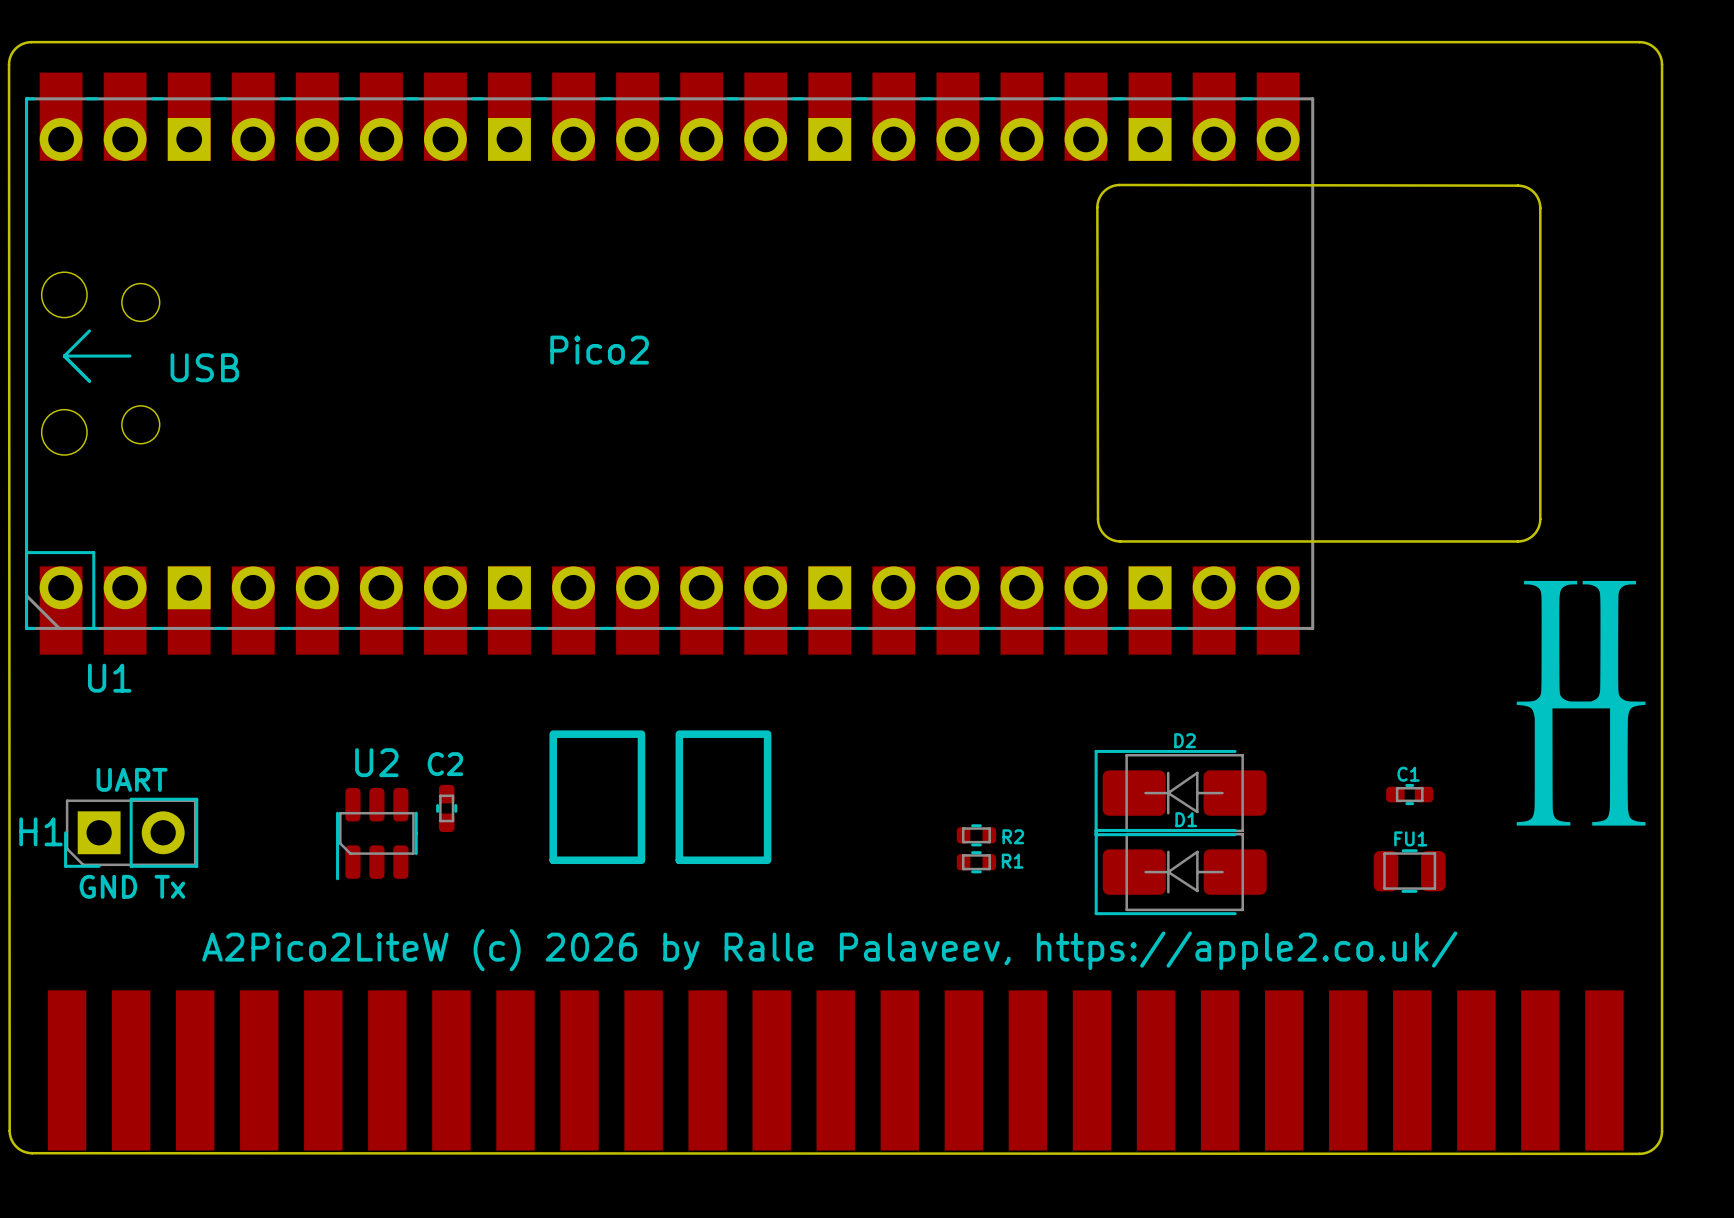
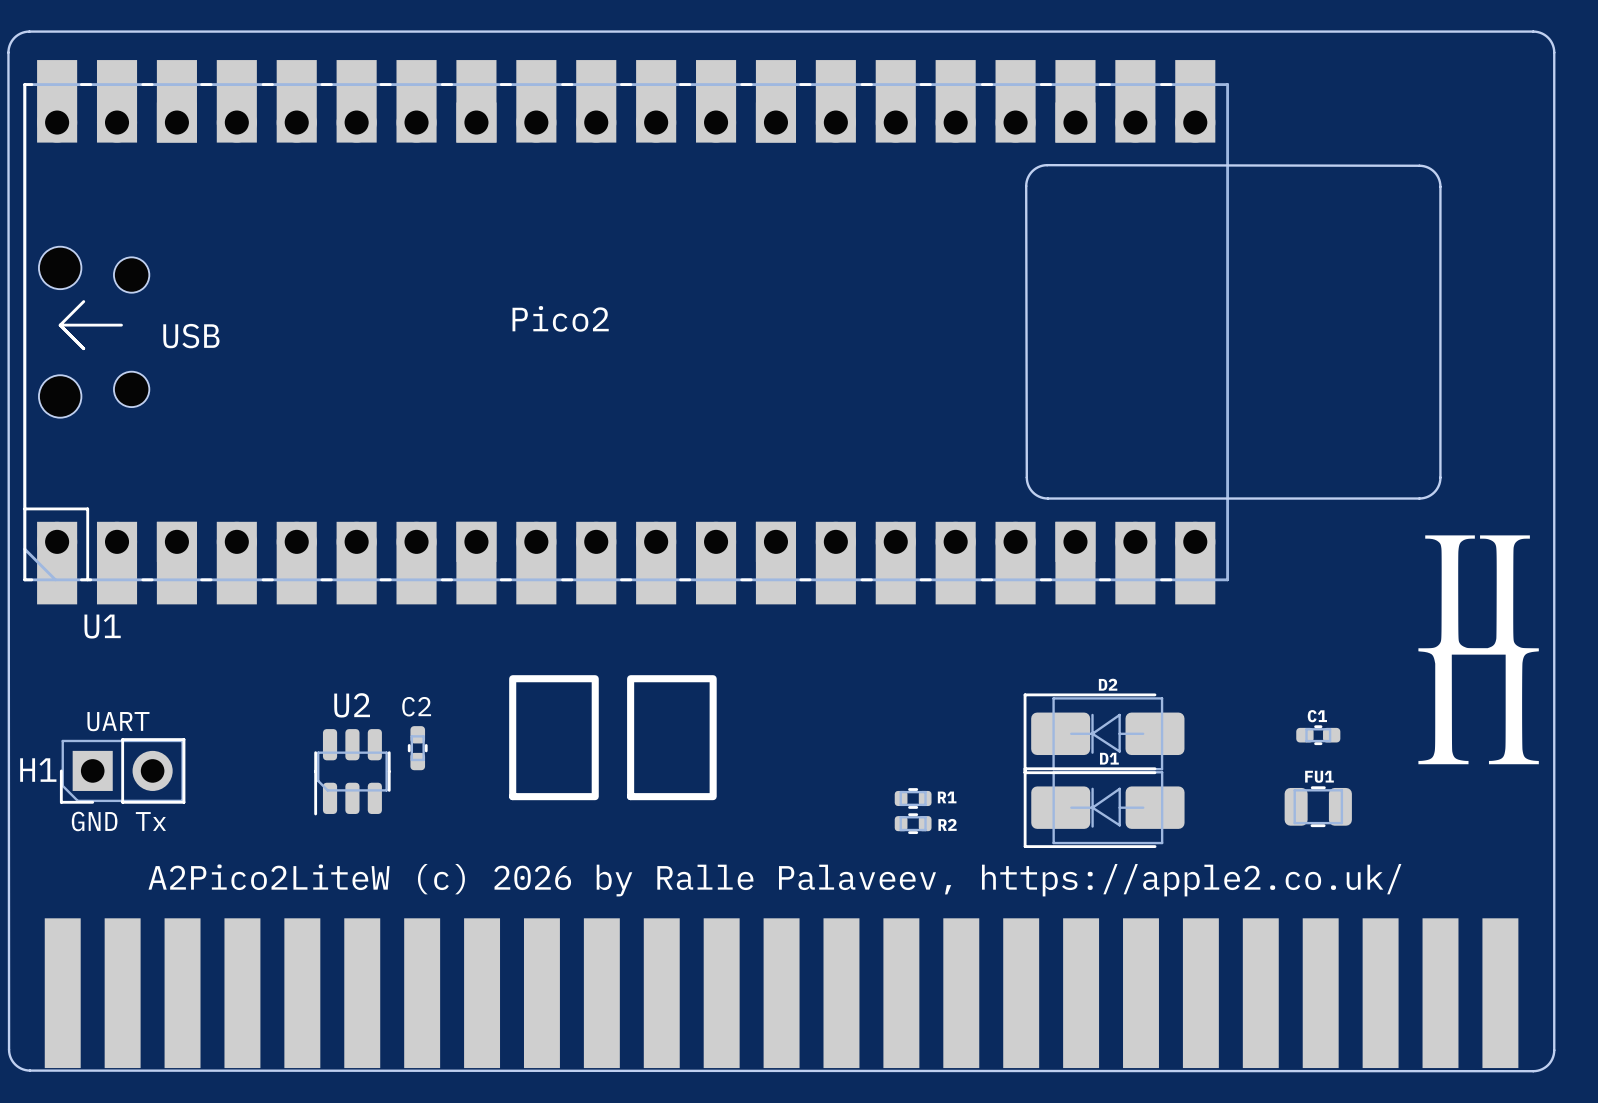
R2 position: (976, 835) -> (913, 823)

